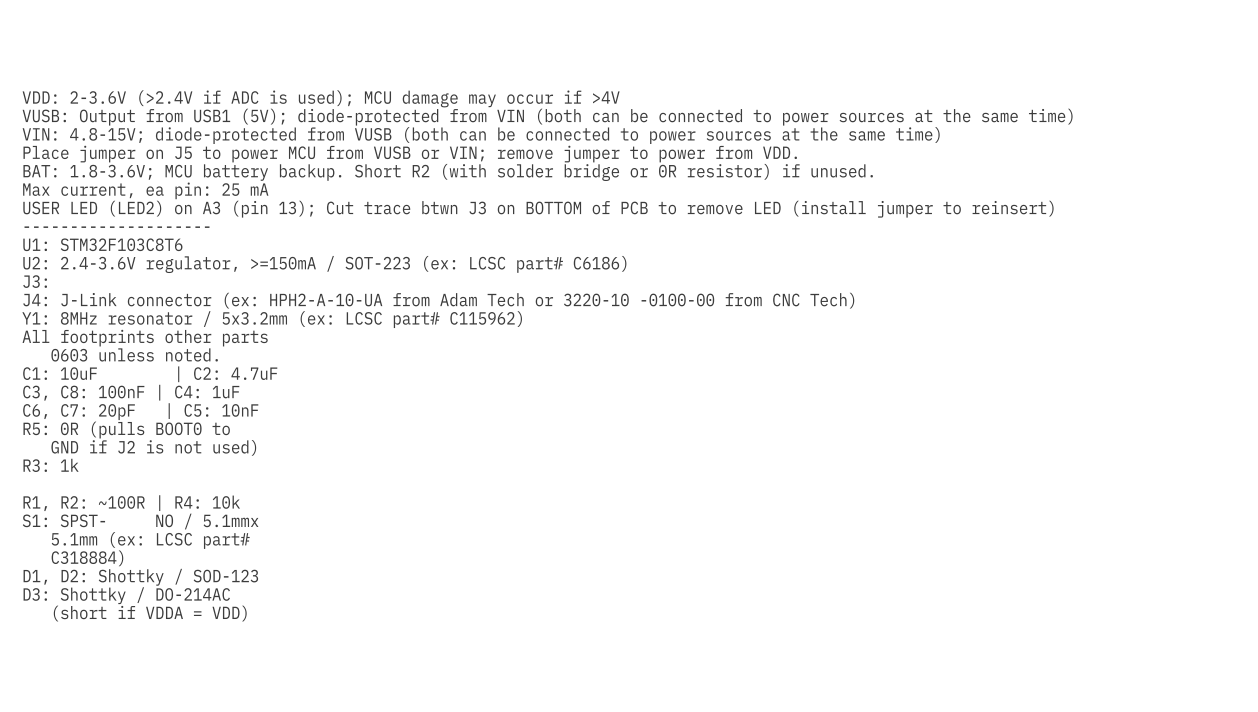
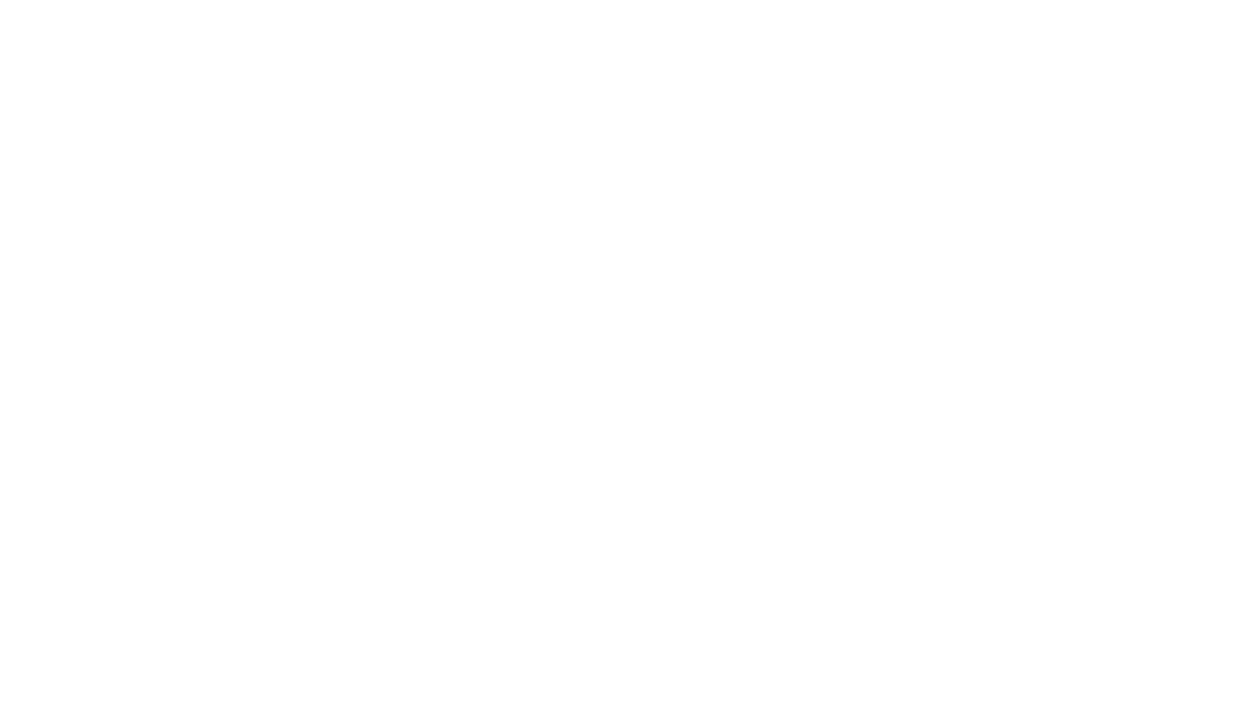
text: VDD: 2-3.6V (>2.4V if ADC is used); MCU damage may occur if >4V (321, 98) -> none
text: VUSB: Output from USB1 (5V); diode-protected from VIN (both can be connected to power sources at the same time) (547, 117) -> none
text: VIN: 4.8-15V; diode-protected from VUSB (both can be connected to power sources at the same time) (481, 135) -> none
text: Place jumper on J5 to power MCU from VUSB or VIN; remove jumper to power from VDD. (410, 154) -> none
text: BAT: 1.8-3.6V; MCU battery backup. Short R2 (with solder bridge or 0R resistor) if unused. (448, 172) -> none
text: Max current, ea pin: 25 mA (145, 190) -> none
text: USER LED (LED2) on A3 (pin 13); Cut trace btwn J3 on BOTTOM of PCB to remove LED (install jumper to reinsert) (538, 209) -> none
text: -------------------- (117, 227) -> none
text: U1: STM32F103C8T6 (102, 244) -> none
text: U2: 2.4-3.6V regulator, >=150mA / SOT-223 (ex: LCSC part# C6186) (324, 264) -> none
text: J3: (35, 281) -> none
text: J4: J-Link connector (ex: HPH2-A-10-UA from Adam Tech or 3220-10 -0100-00 from CNC Tech) (438, 300) -> none
text: Y1: 8MHz resonator / 5x3.2mm (ex: LCSC part# C115962) (272, 319) -> none
text: All footprints other parts (145, 338) -> none
text: 0603 unless noted. (134, 354) -> none
text: C1: 10uF | C2: 4.7uF (150, 374) -> none
text: C3, C8: 100nF | C4: 1uF (131, 392) -> none
text: C6, C7: 20pF | C5: 10nF (140, 411) -> none
text: R5: 0R (pulls BOOT0 to (126, 430) -> none
text: GND if J2 is not used) (153, 447) -> none
text: R3: 1k (51, 465) -> none
text: R1, R2: ~100R | R4: 10k (131, 503) -> none
text: S1: SPST- NO / 5.1mmx (140, 521) -> none
text: 5.1mm (ex: LCSC part# (150, 540) -> none
text: C318884) (87, 558) -> none
text: D1, D2: Shottky / SOD-123 (140, 577) -> none
text: D3: Shottky / DO-214AC (126, 595) -> none
text: (short if VDDA = VDD) (150, 613) -> none

